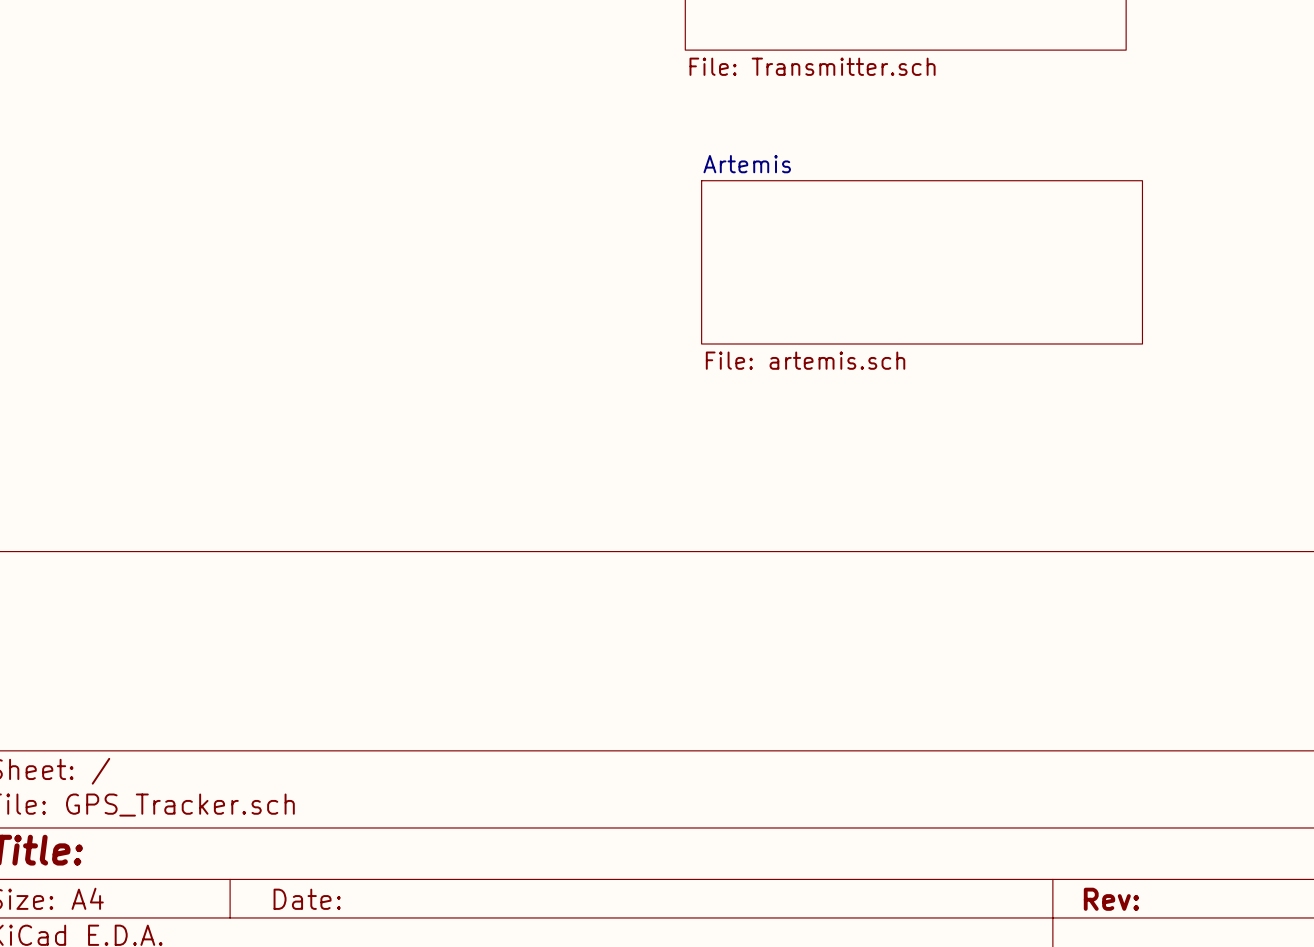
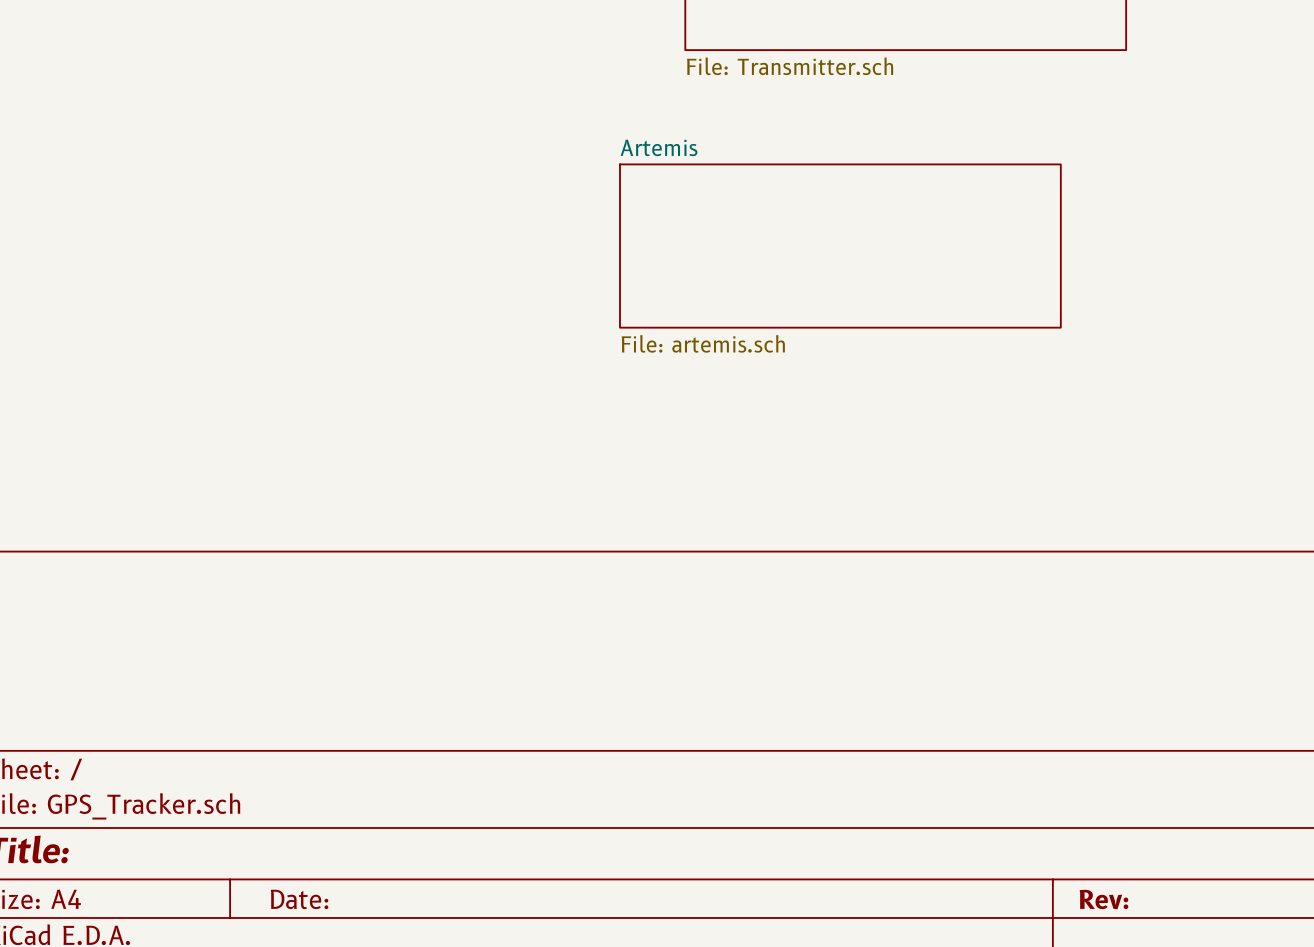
sheet Artemis position: (922, 262) -> (840, 246)

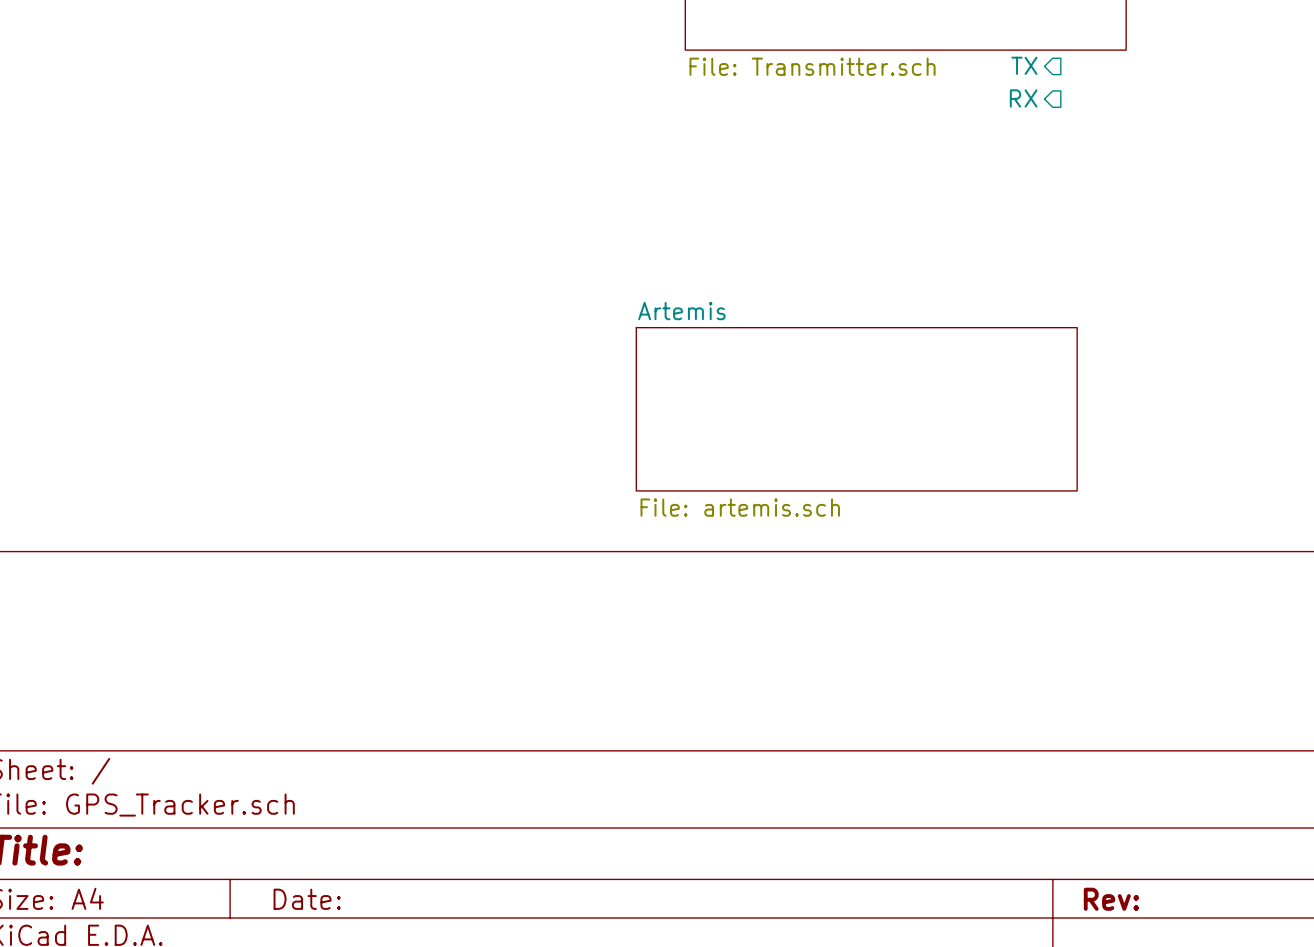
sheet pin: none -> TX (1024, 65)
sheet pin: none -> RX (1023, 98)
sheet Artemis position: (840, 246) -> (856, 409)

